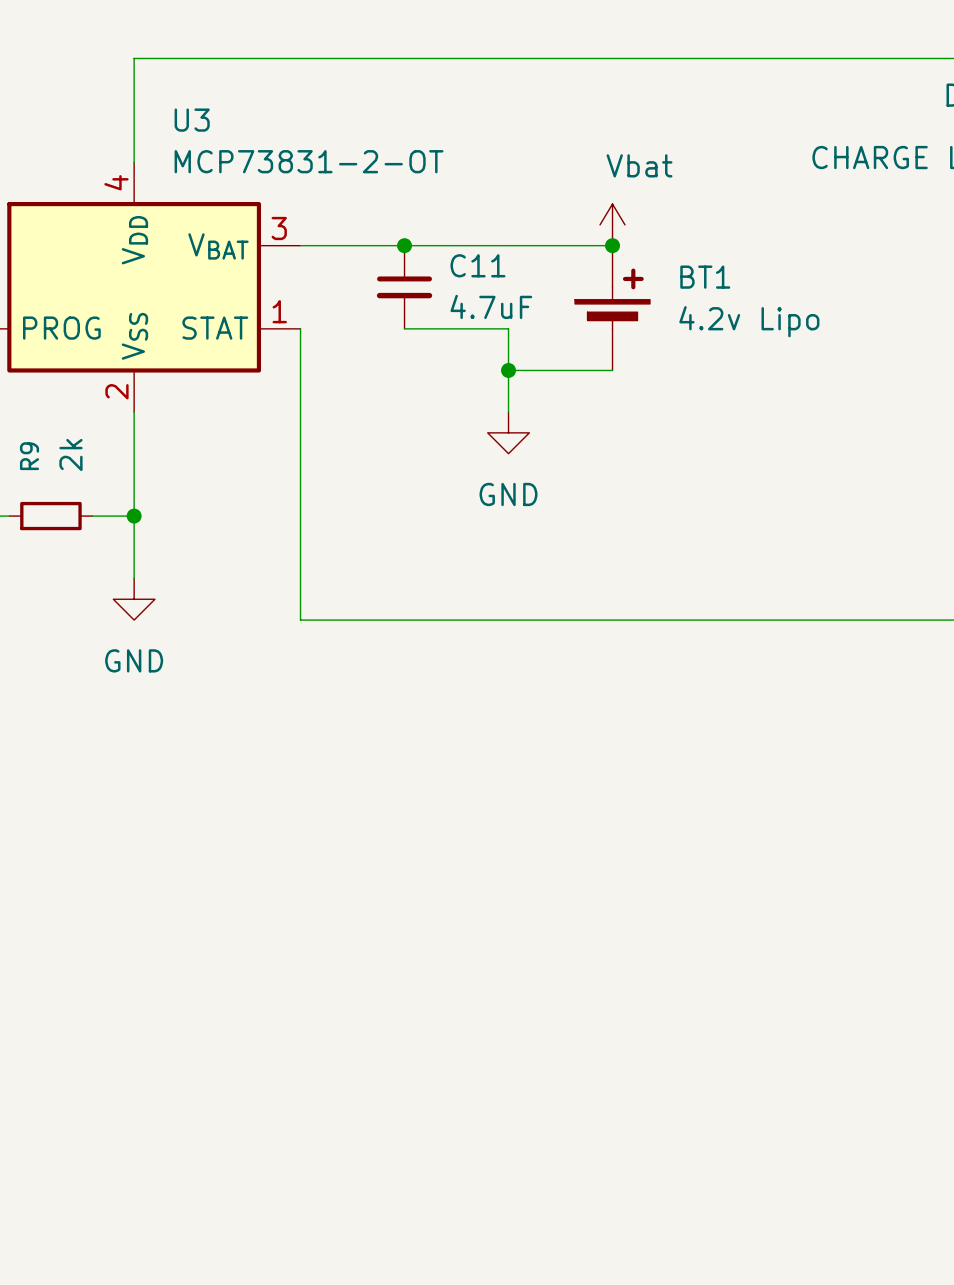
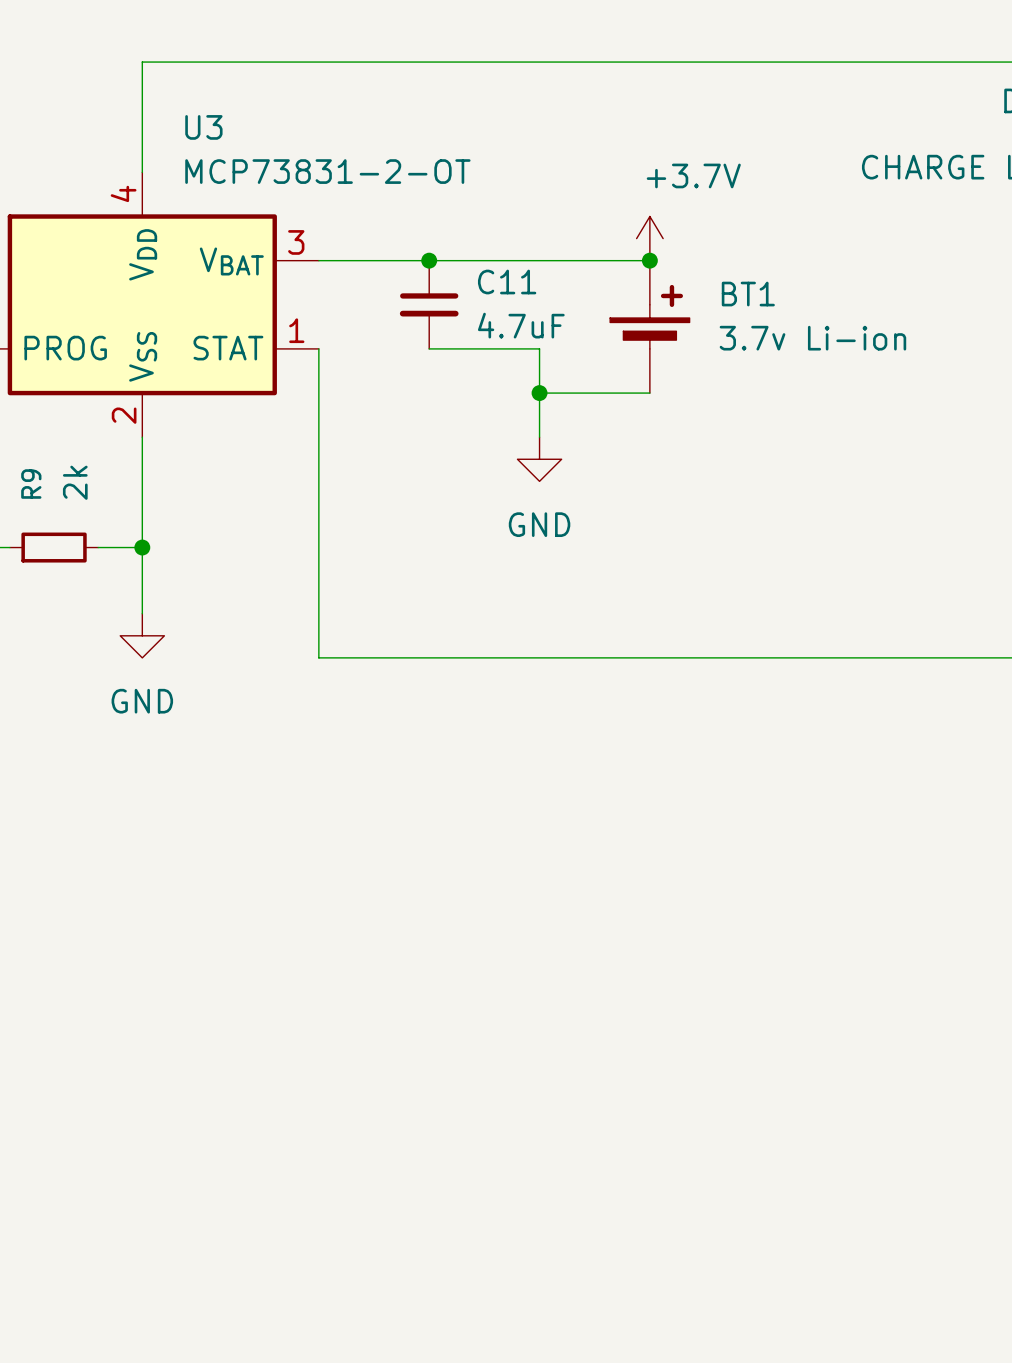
power symbol: Vbat (612, 224) -> +3.7V (649, 238)
BT1 value: 4.2v Lipo (749, 321) -> 3.7v Li-ion (812, 338)

